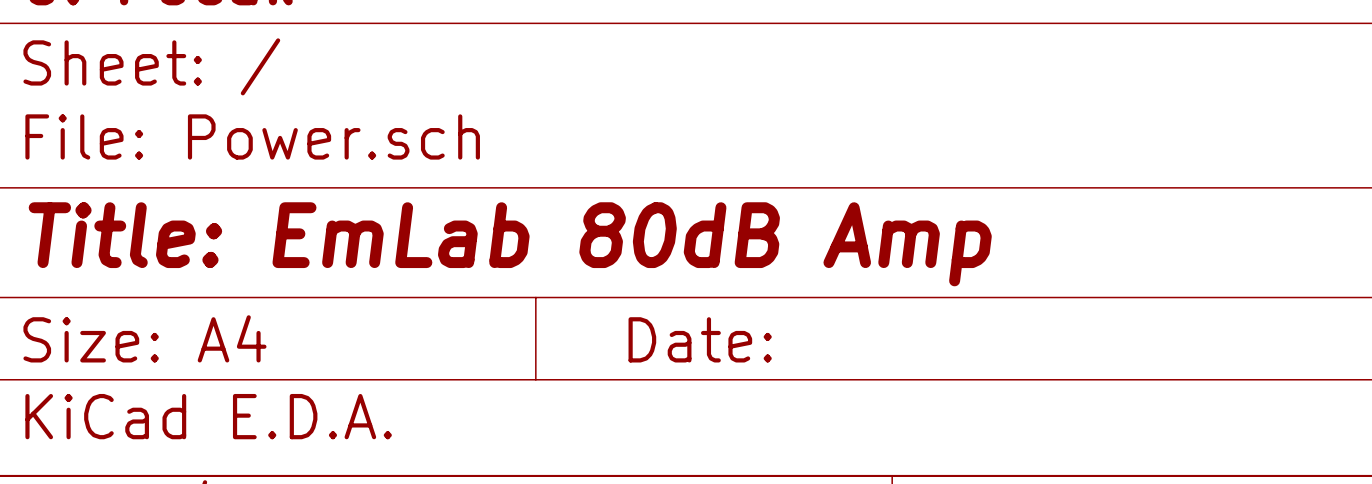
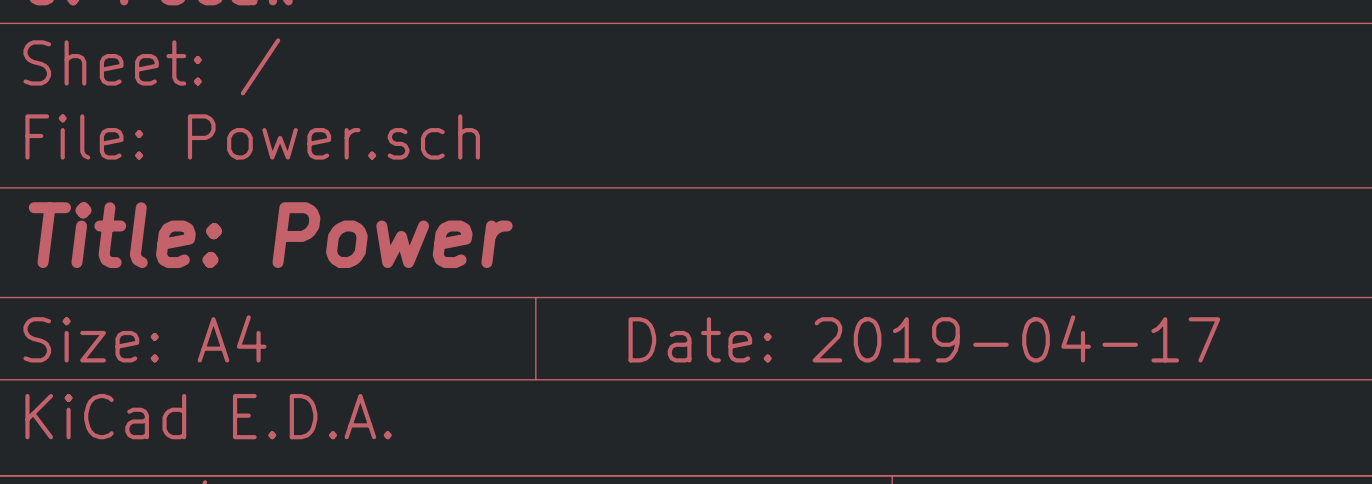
title block: Title: EmLab 80dB Amp (510, 244) -> Title: Power (270, 235)
title block: Date: (700, 339) -> Date: 2019-04-17 (924, 338)

